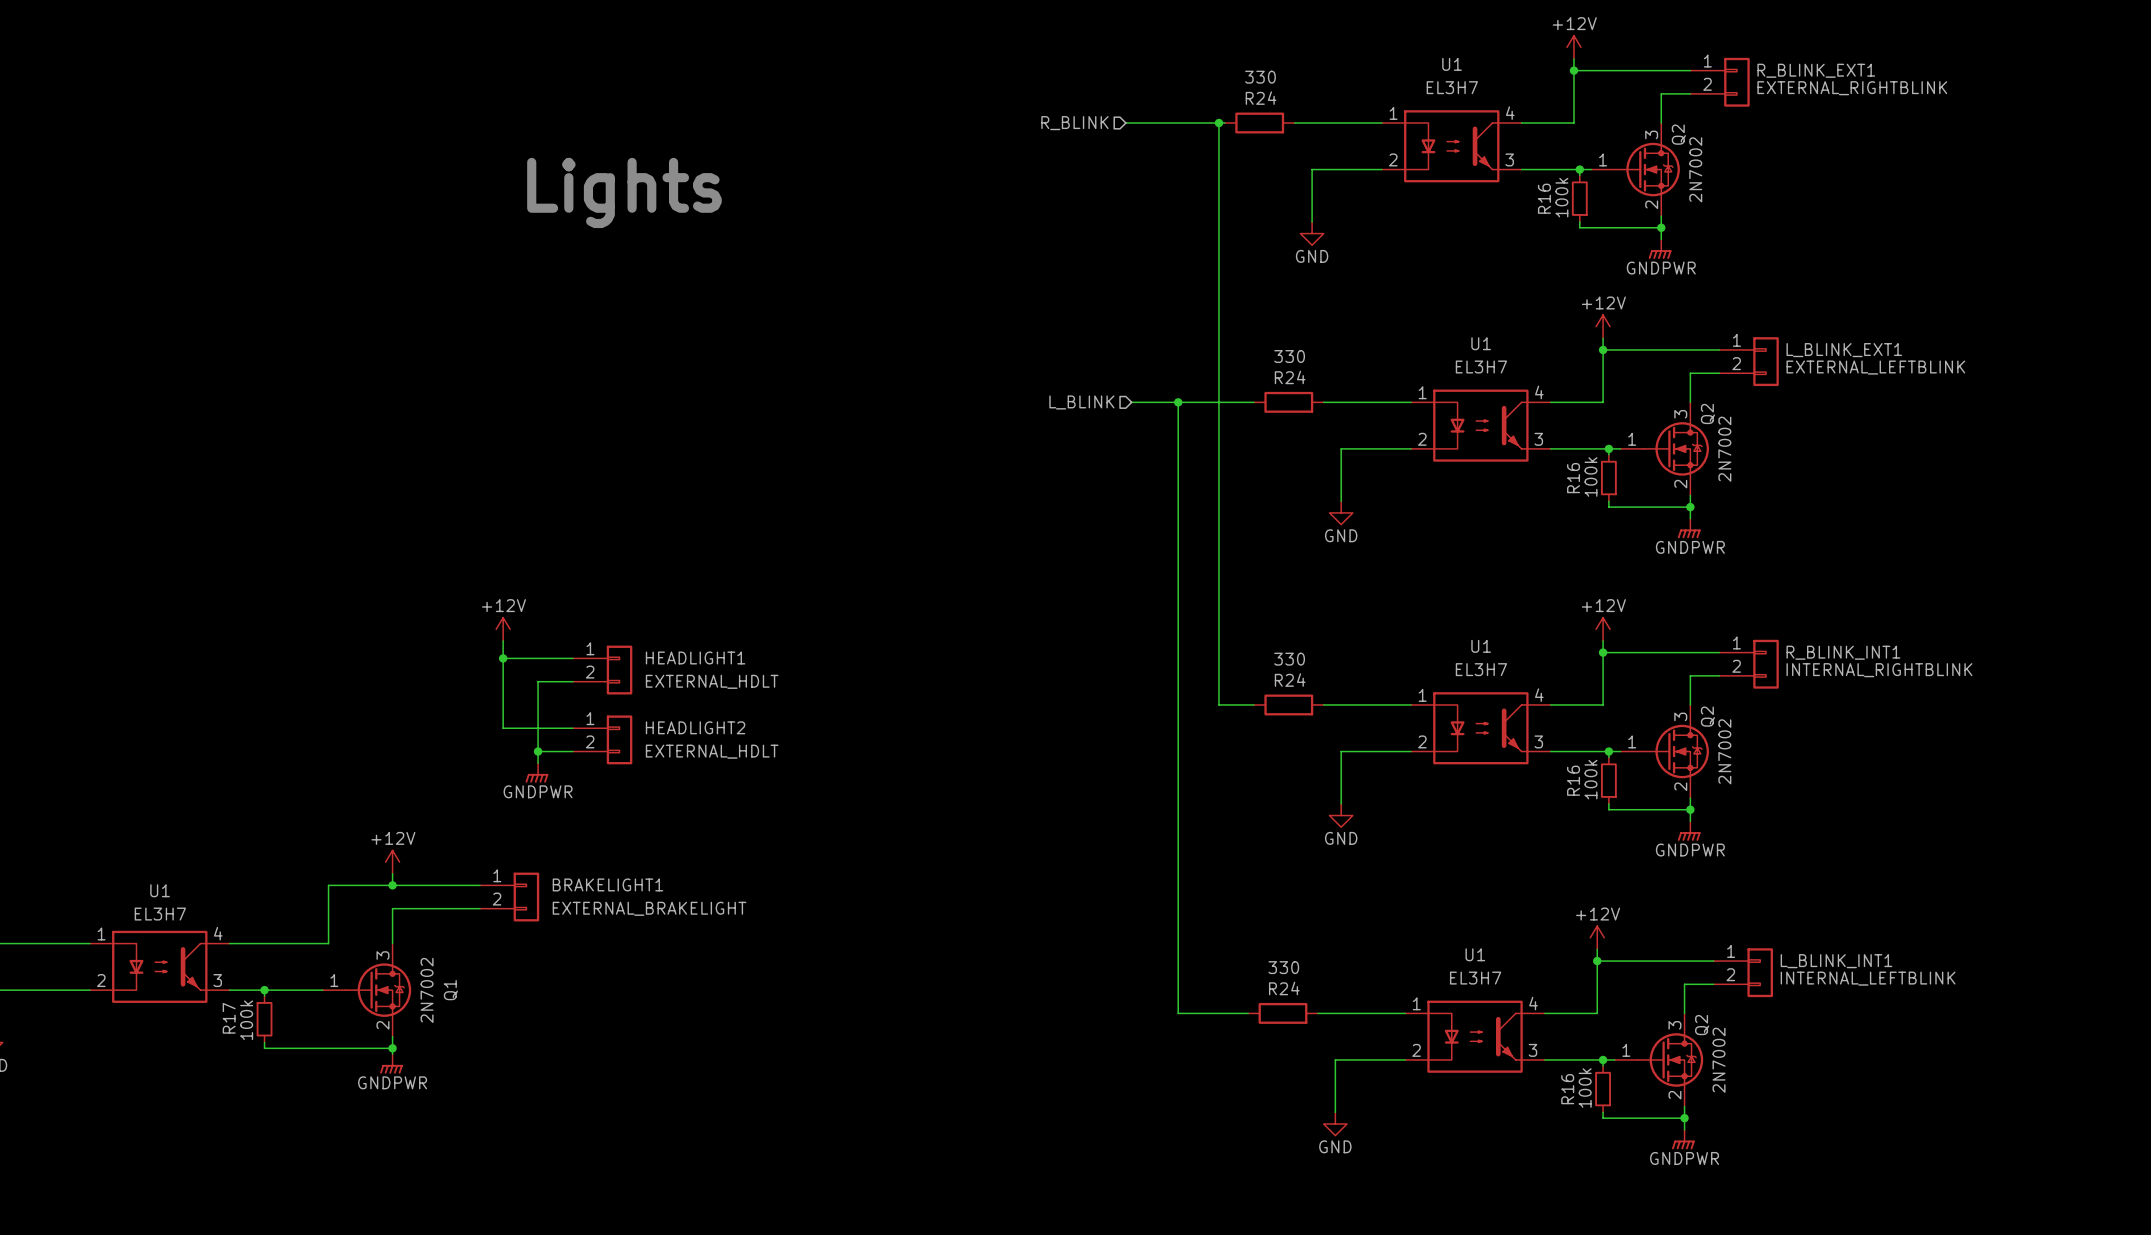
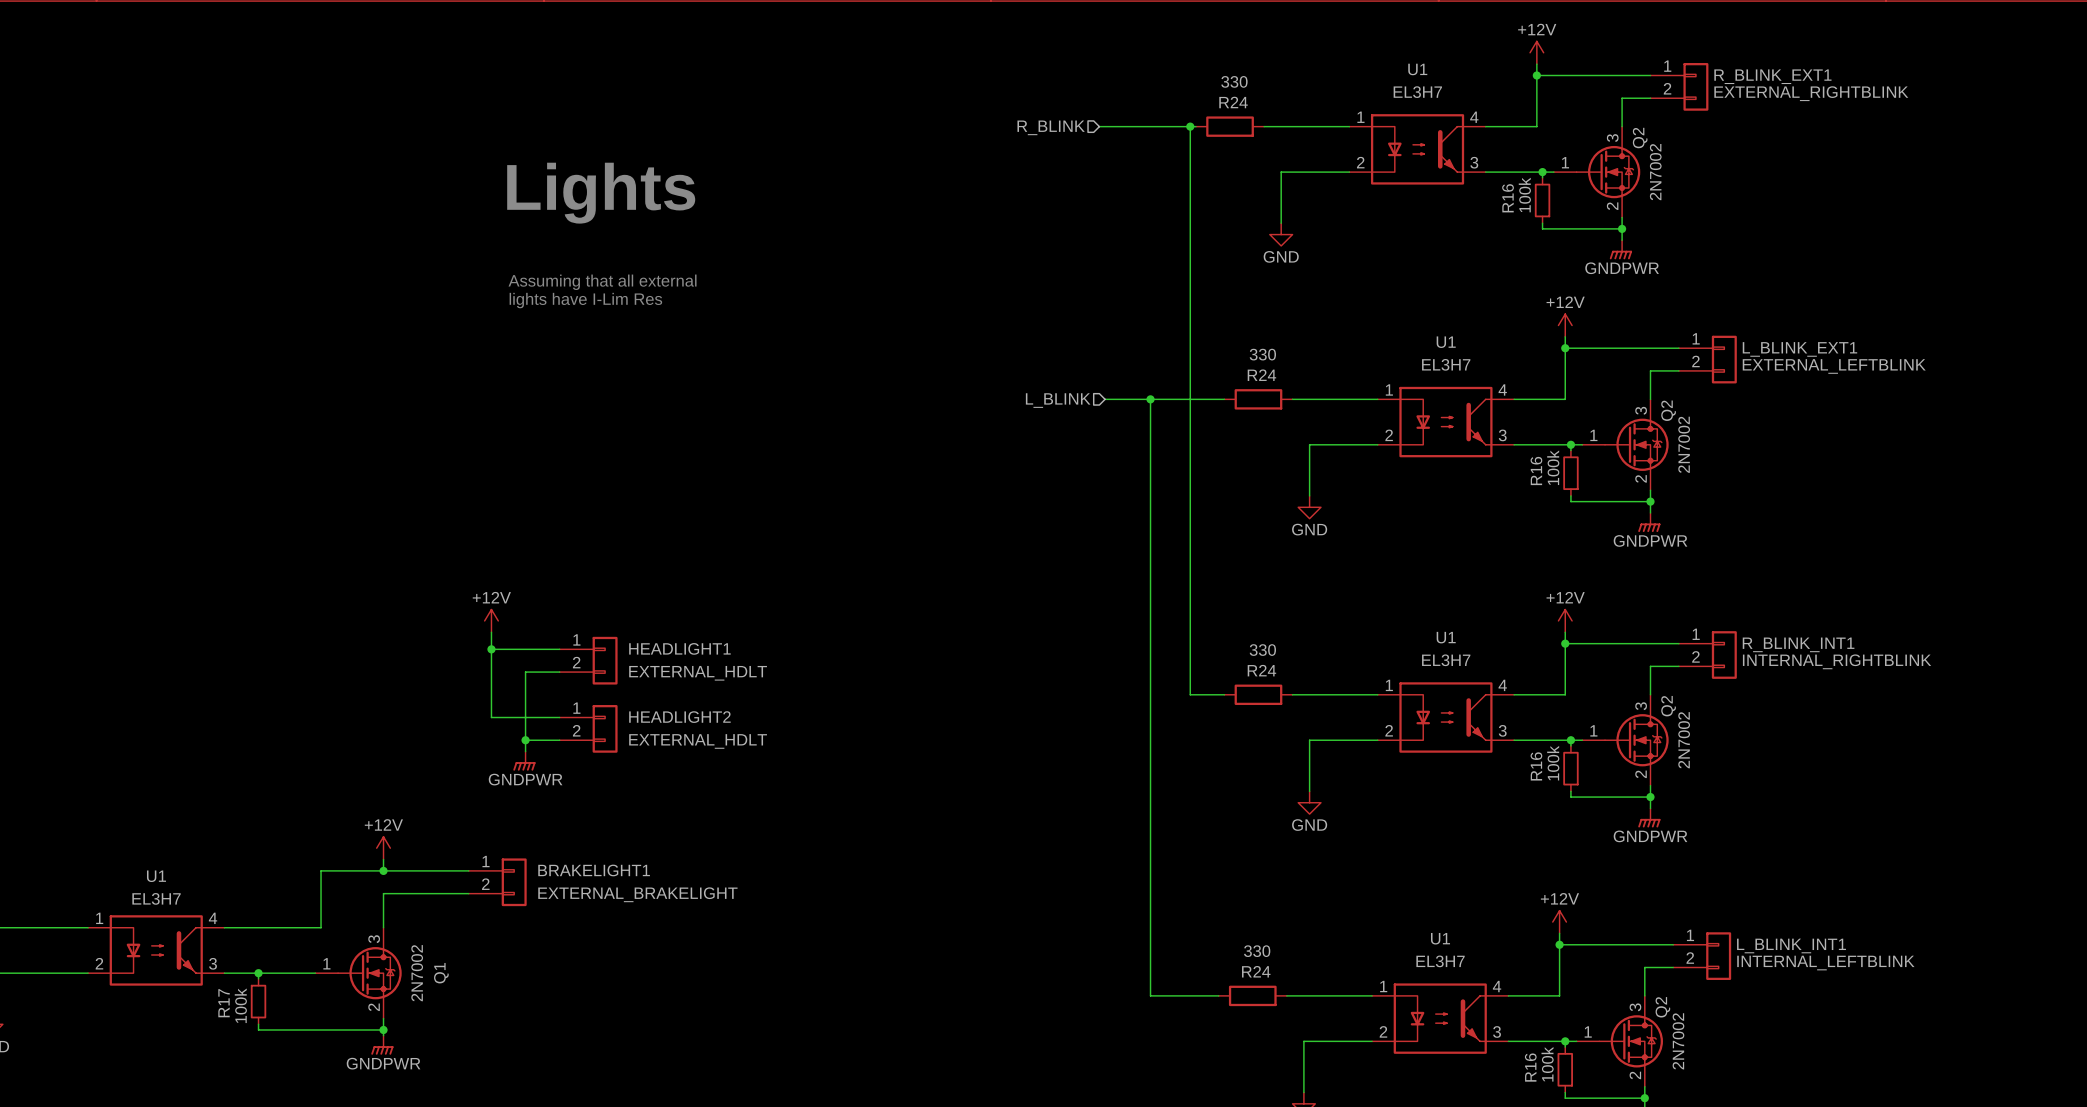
text: none -> Assuming that all external (602, 282)
text: none -> lights have I-Lim Res (585, 300)

